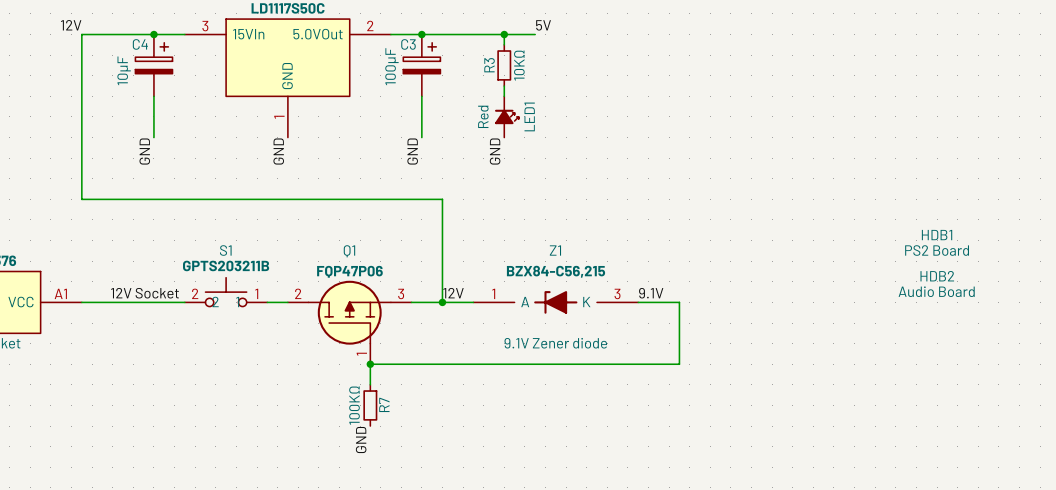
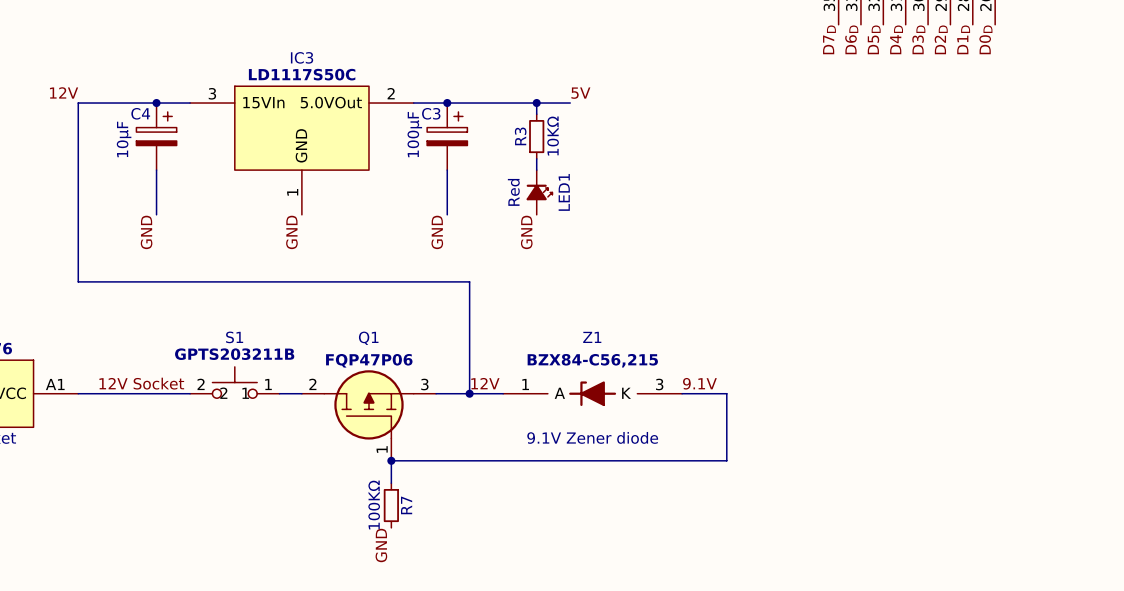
HDB1: PS2 Board (937, 242) -> none
HDB2: Audio Board (936, 284) -> none

